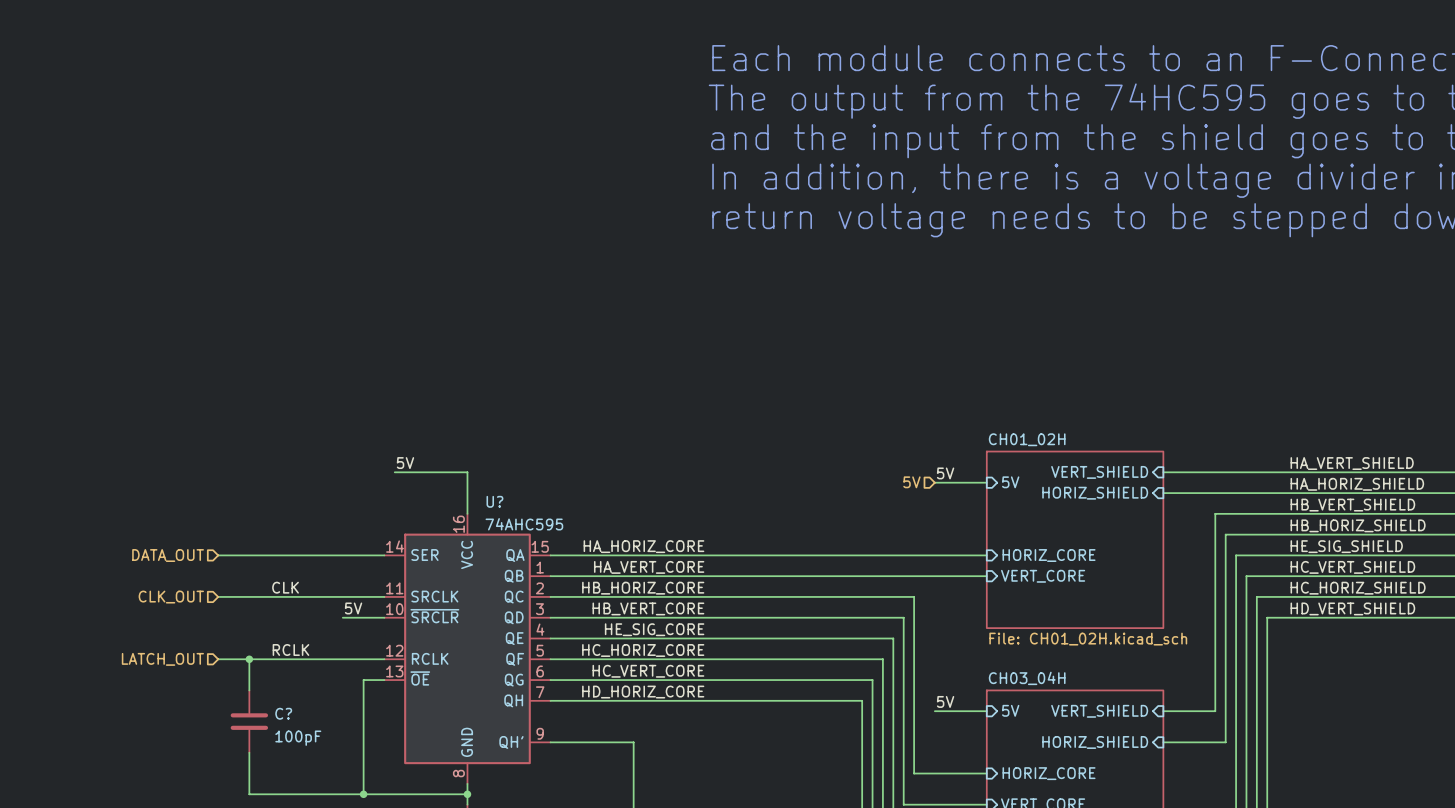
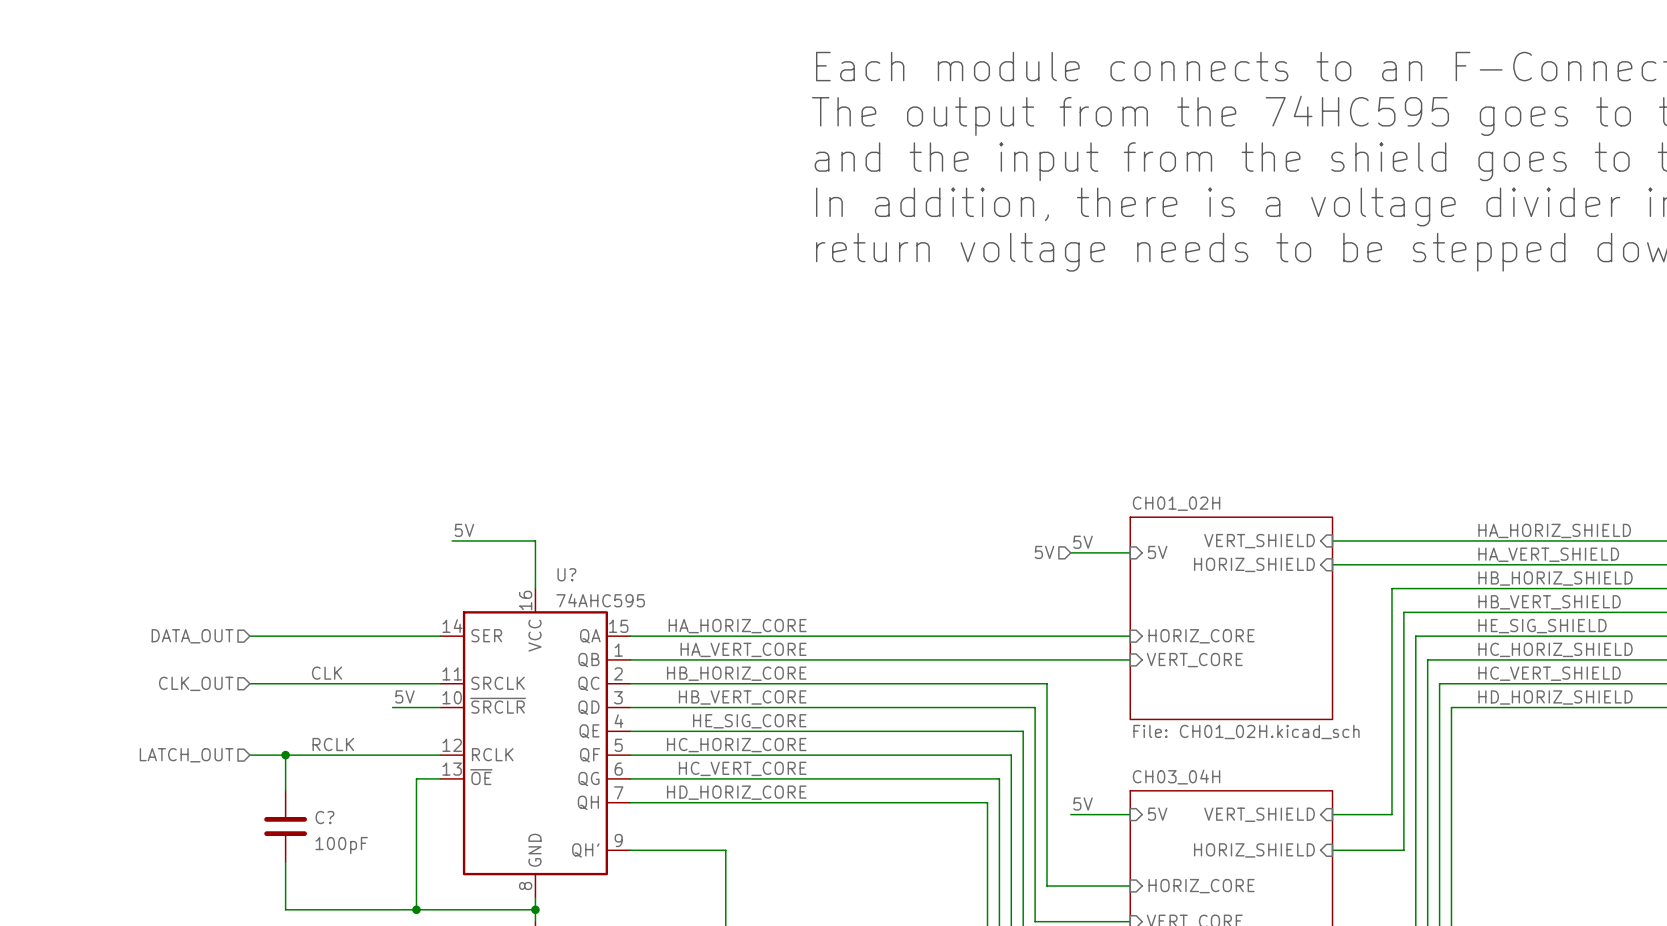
label: HA_VERT_SHIELD (1352, 463) -> HA_HORIZ_SHIELD (1554, 530)
label: HA_HORIZ_SHIELD (1357, 484) -> HA_VERT_SHIELD (1548, 554)
label: HB_VERT_SHIELD (1352, 505) -> HB_HORIZ_SHIELD (1555, 578)
label: HB_HORIZ_SHIELD (1358, 525) -> HB_VERT_SHIELD (1549, 602)
label: HC_VERT_SHIELD (1352, 567) -> HC_HORIZ_SHIELD (1555, 649)
label: HC_HORIZ_SHIELD (1358, 588) -> HC_VERT_SHIELD (1549, 673)
label: HD_VERT_SHIELD (1352, 608) -> HD_HORIZ_SHIELD (1555, 697)

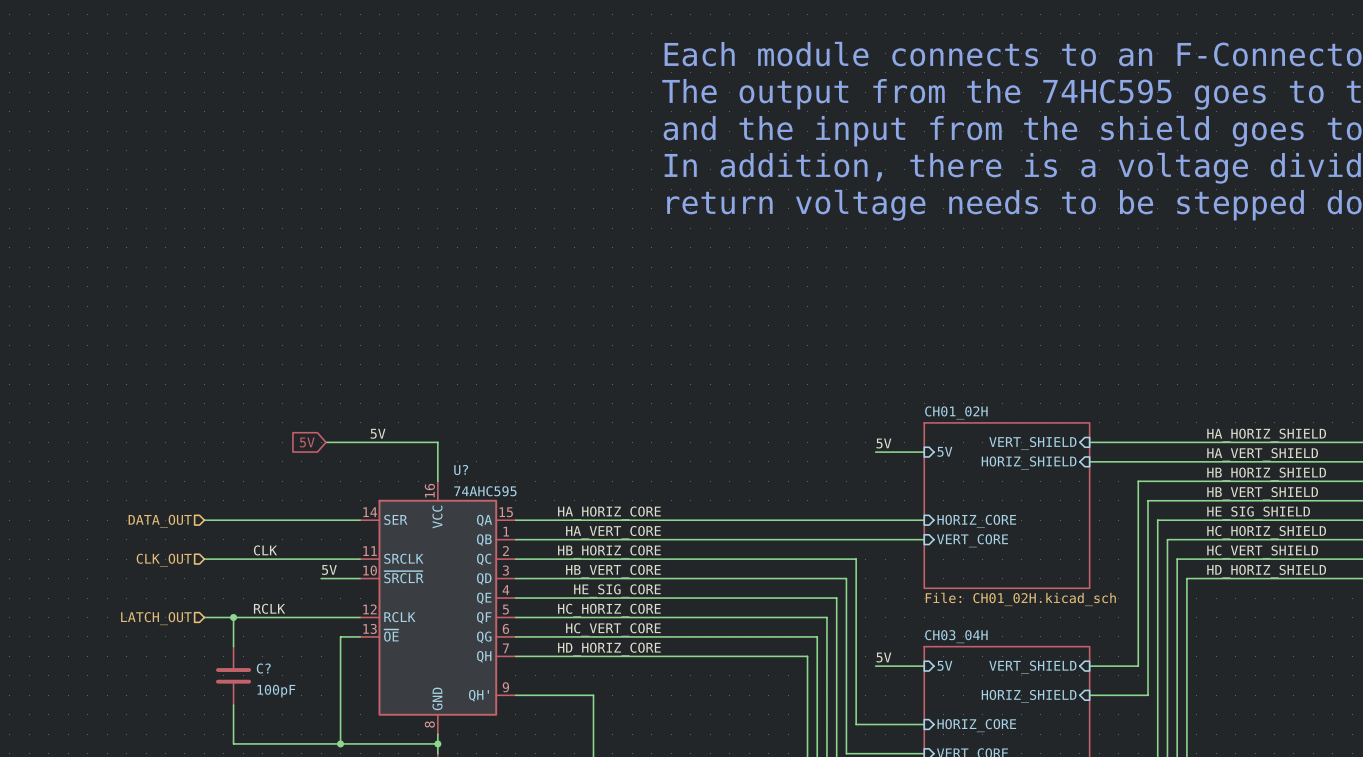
global label: none -> 5V (307, 442)
wire: none -> (325, 442) (369, 442)
hierarchical label: 5V (1044, 552) -> none

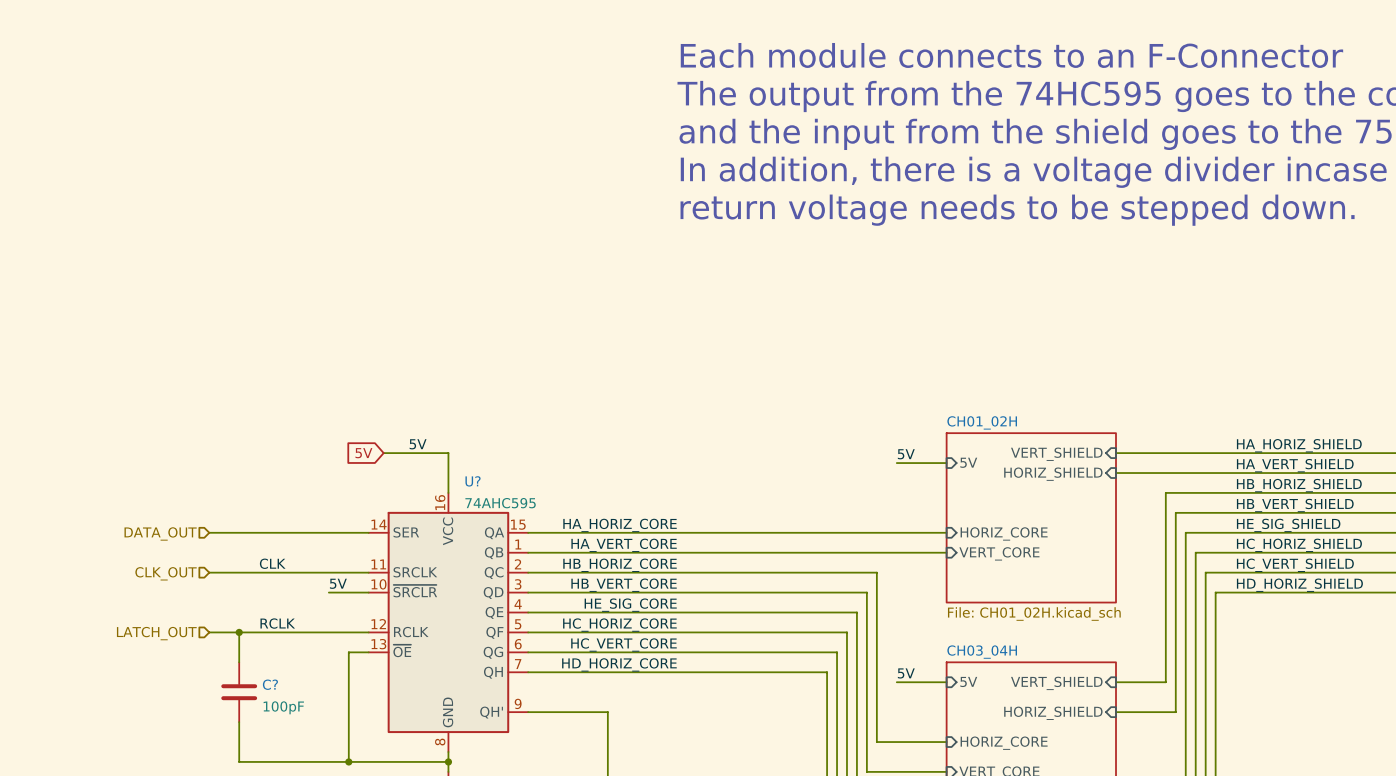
label position: 5V (378, 433) -> 5V (418, 444)
global label position: 5V (307, 442) -> 5V (363, 453)
wire: (325, 442) (374, 442) -> none

